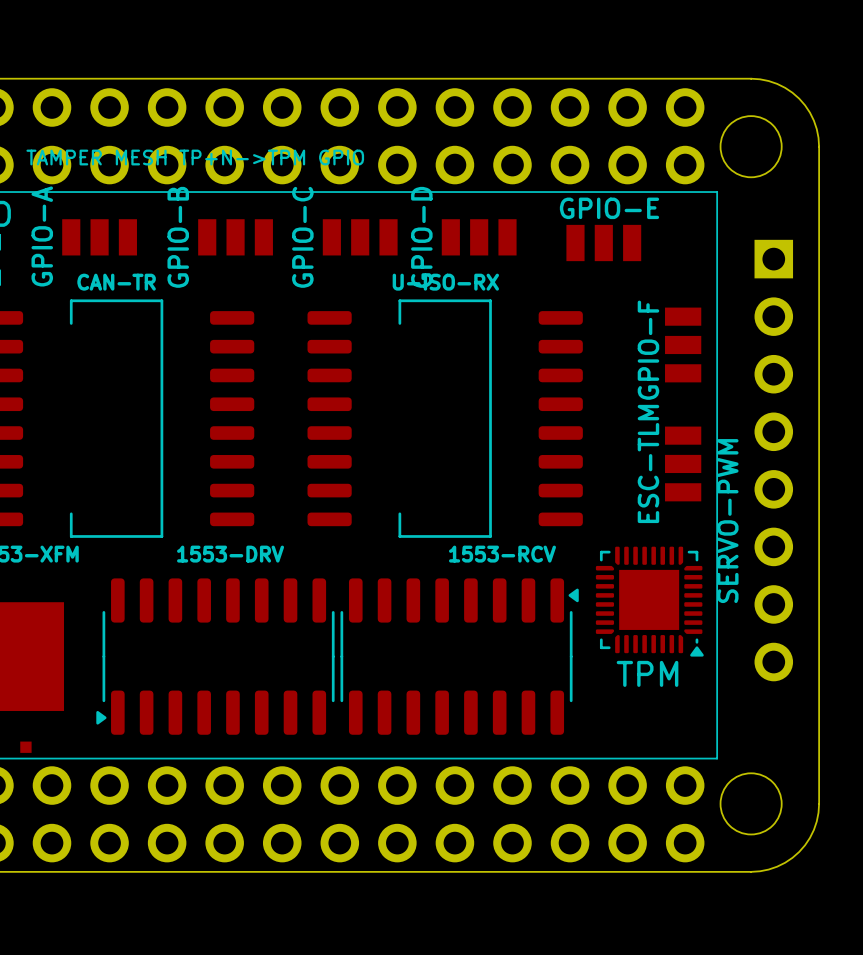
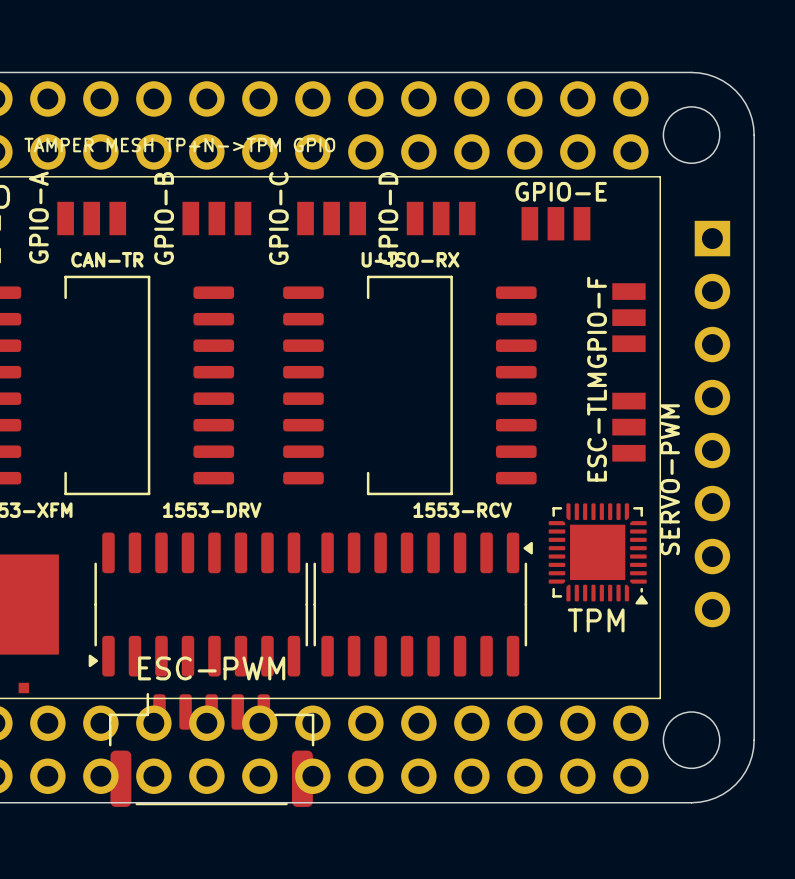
ESC-PWM: none -> (211, 749)

